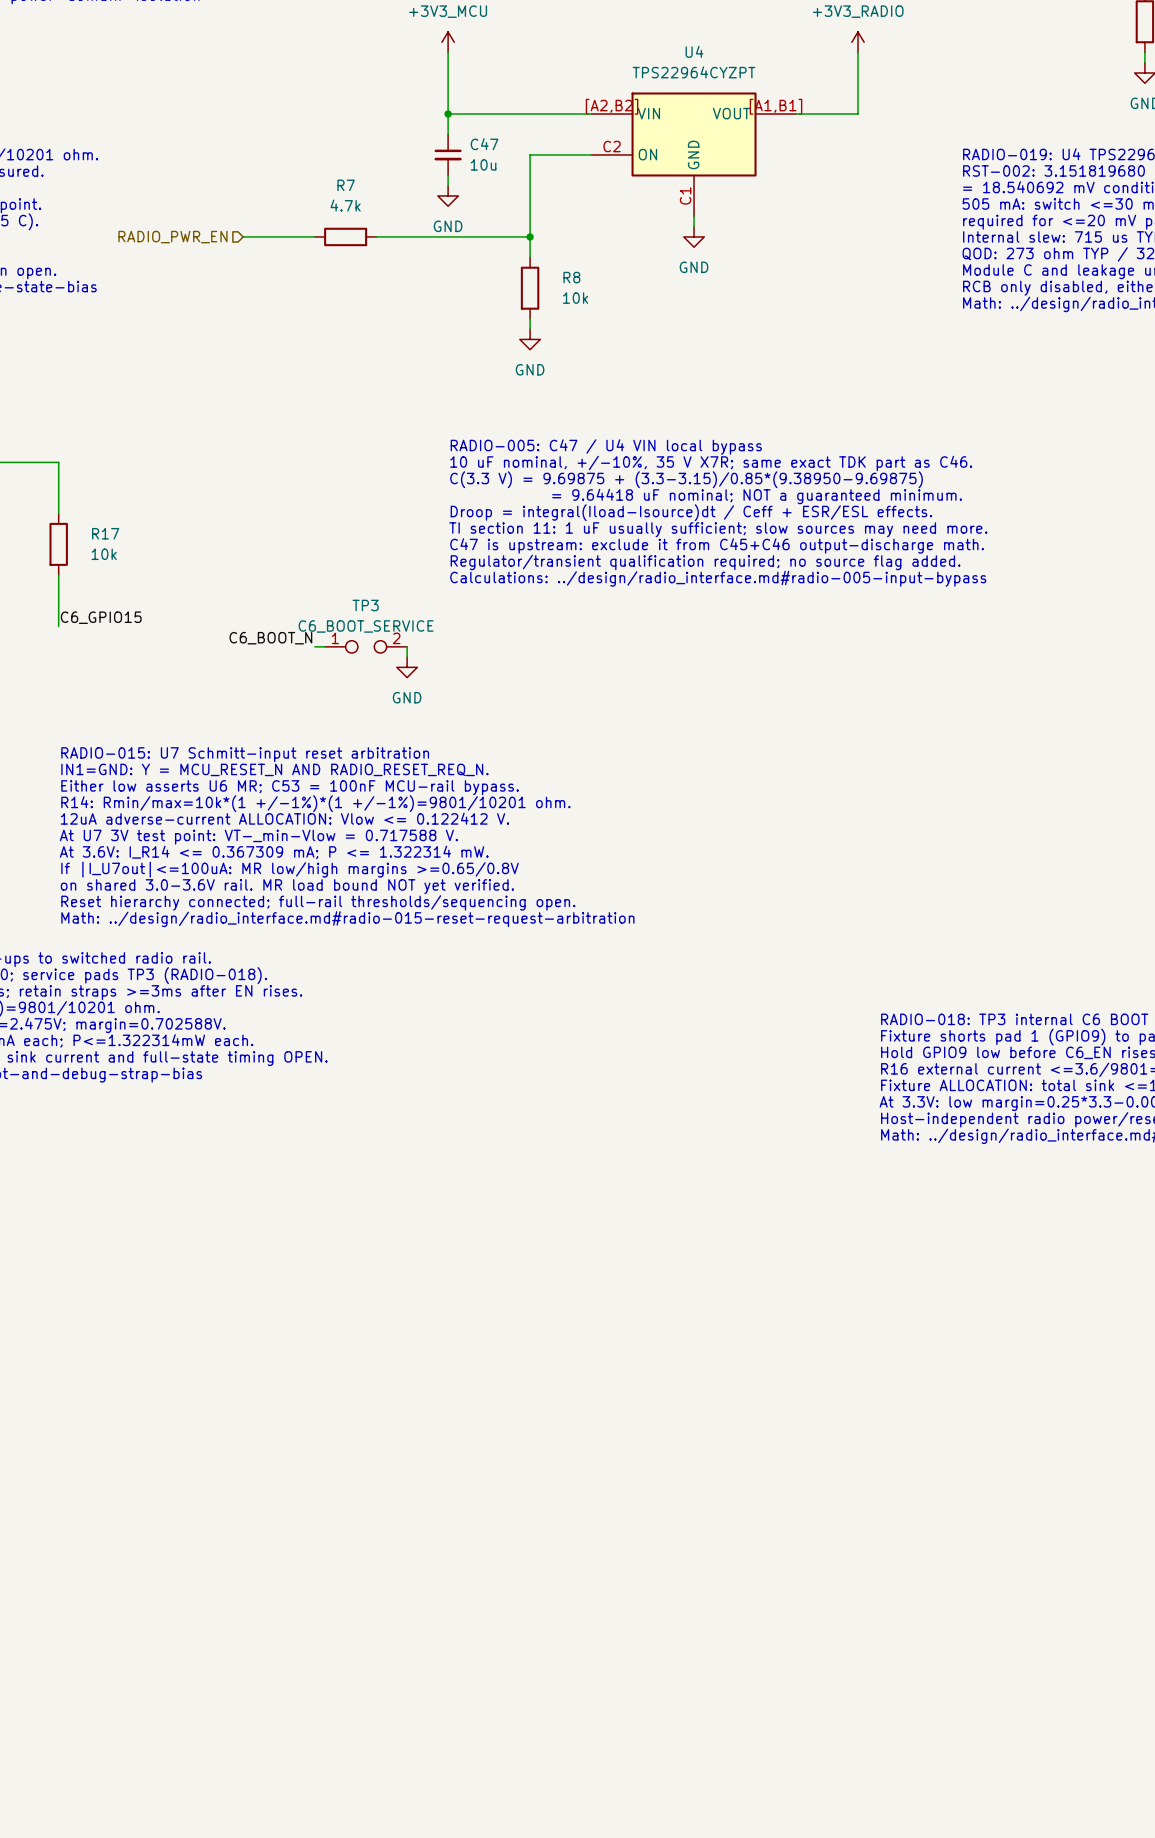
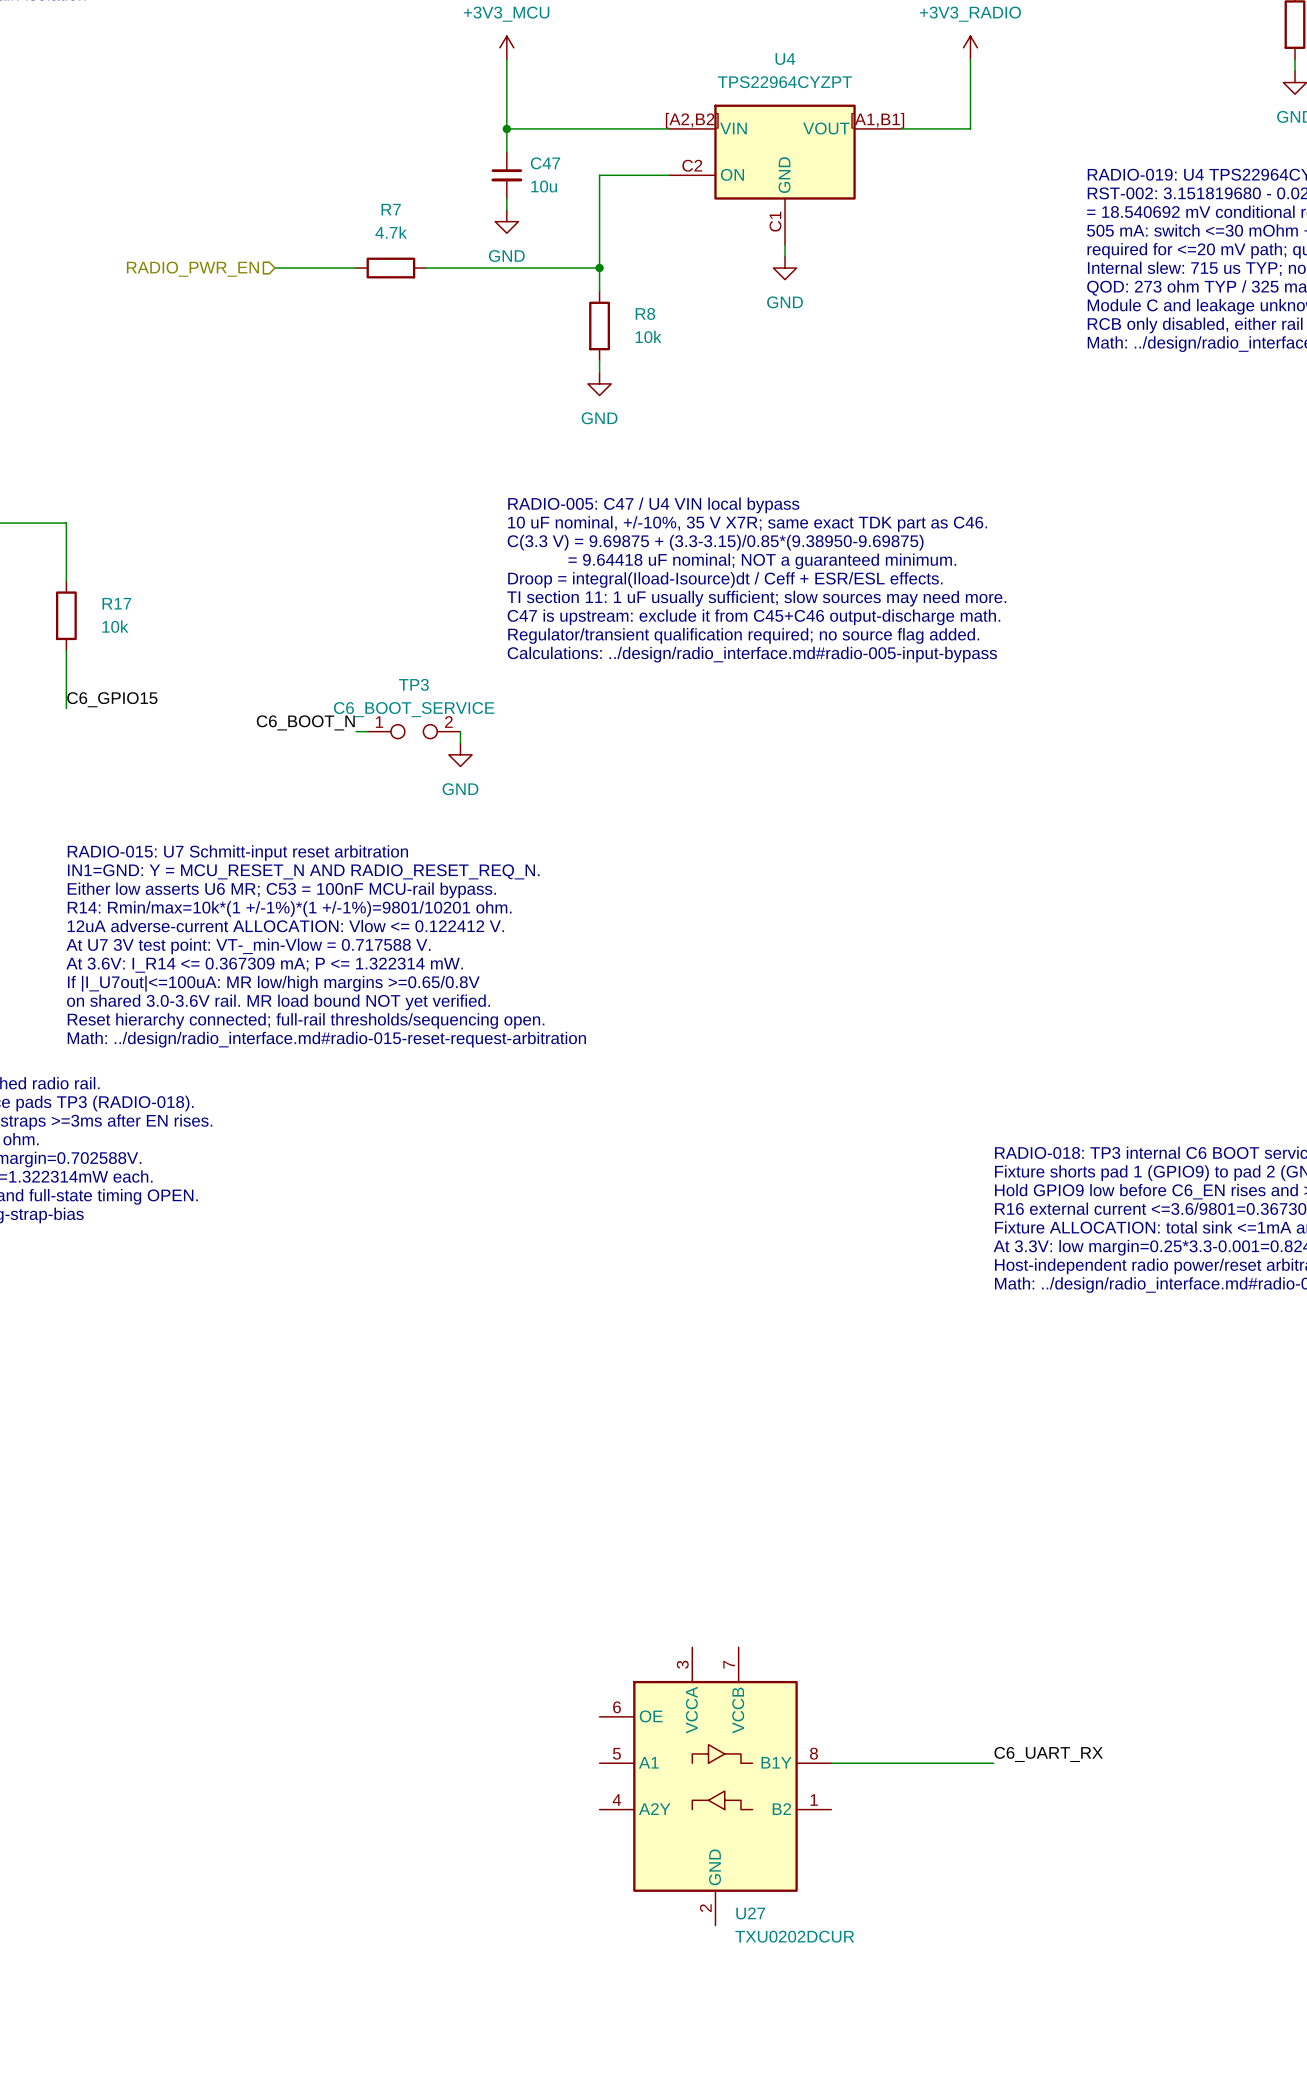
label: none -> C6_UART_RX (1048, 1754)
wire: none -> (831, 1763) (993, 1763)
U27: none -> TXU0202DCUR (715, 1786)

